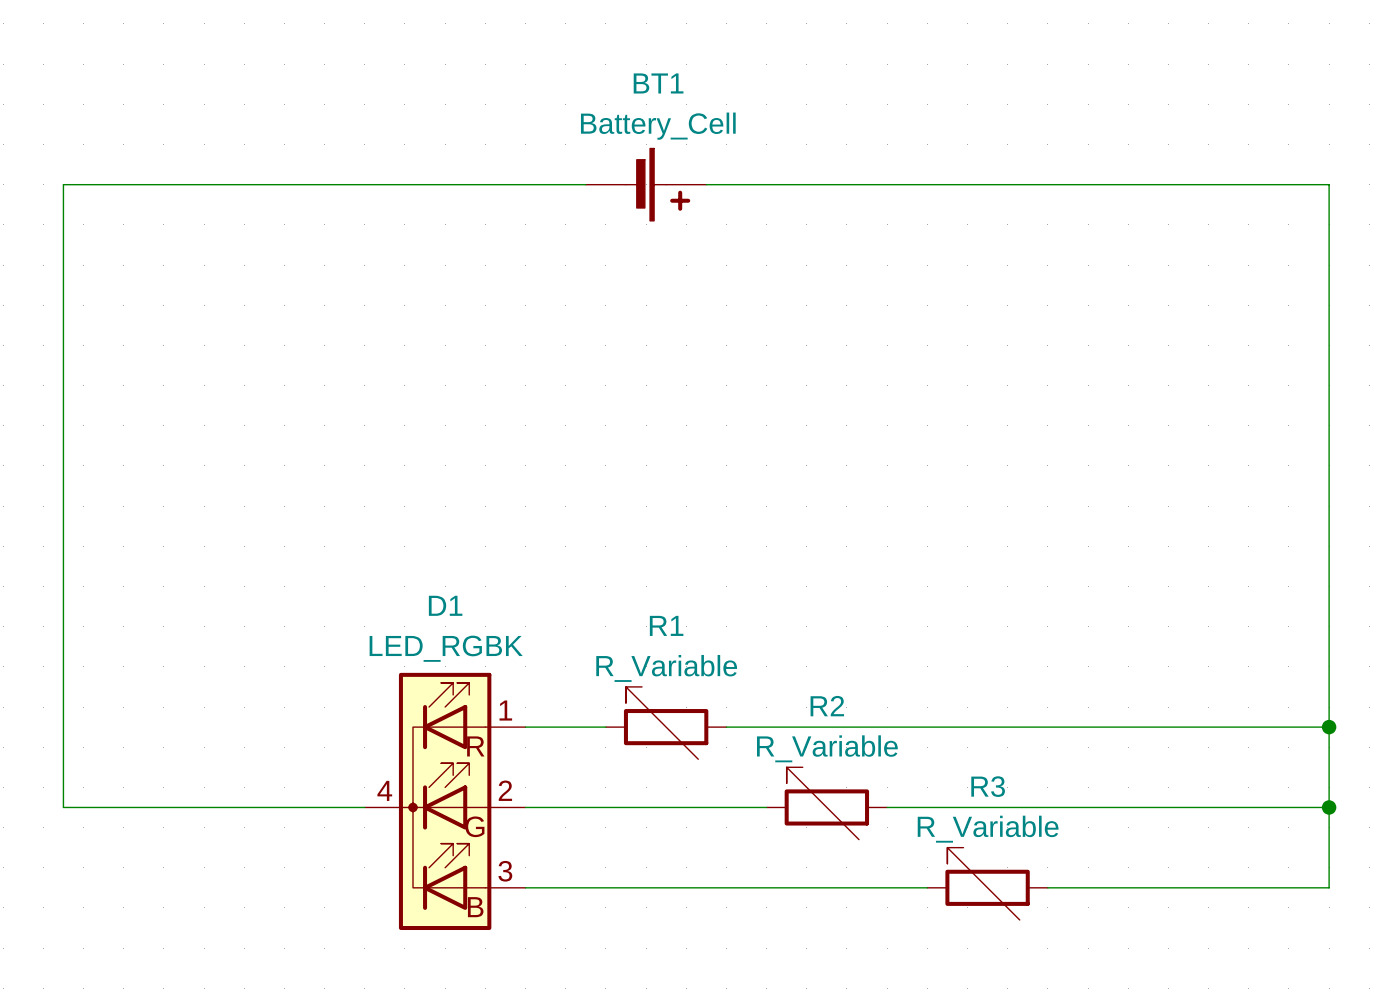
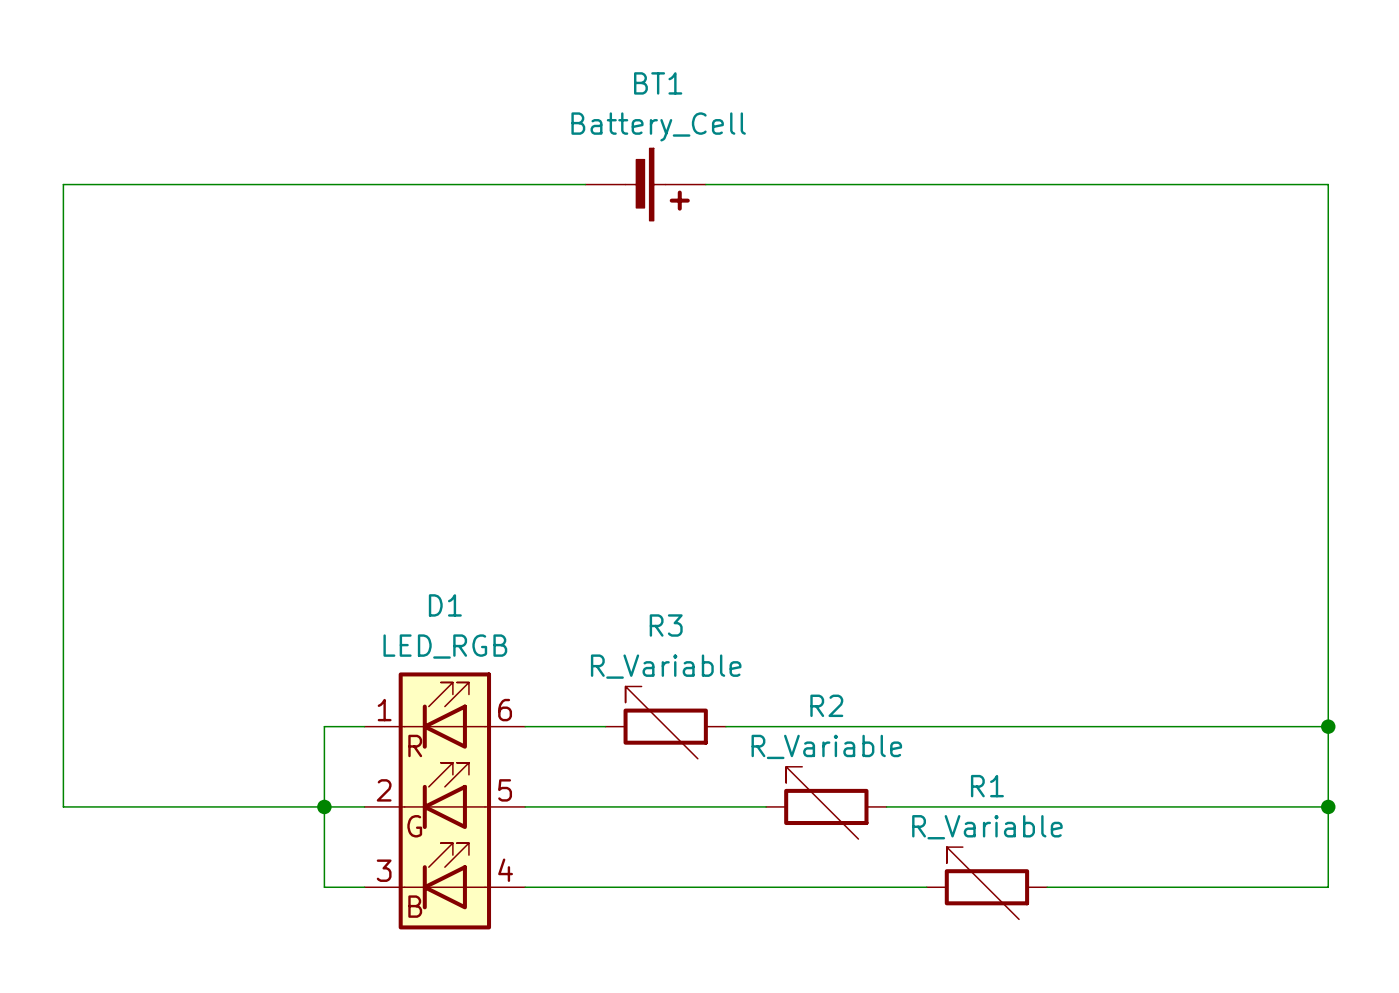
R1 name: R1 (666, 625) -> R3 (666, 625)
D1 value: LED_RGBK (446, 648) -> LED_RGB (445, 646)
D1 symbol: [364, 672, 526, 931] -> [364, 672, 526, 930]
wire: none -> (364, 726) (324, 726) (324, 887) (364, 887)
R3 name: R3 (988, 786) -> R1 (987, 786)
junction: none -> (324, 806)

